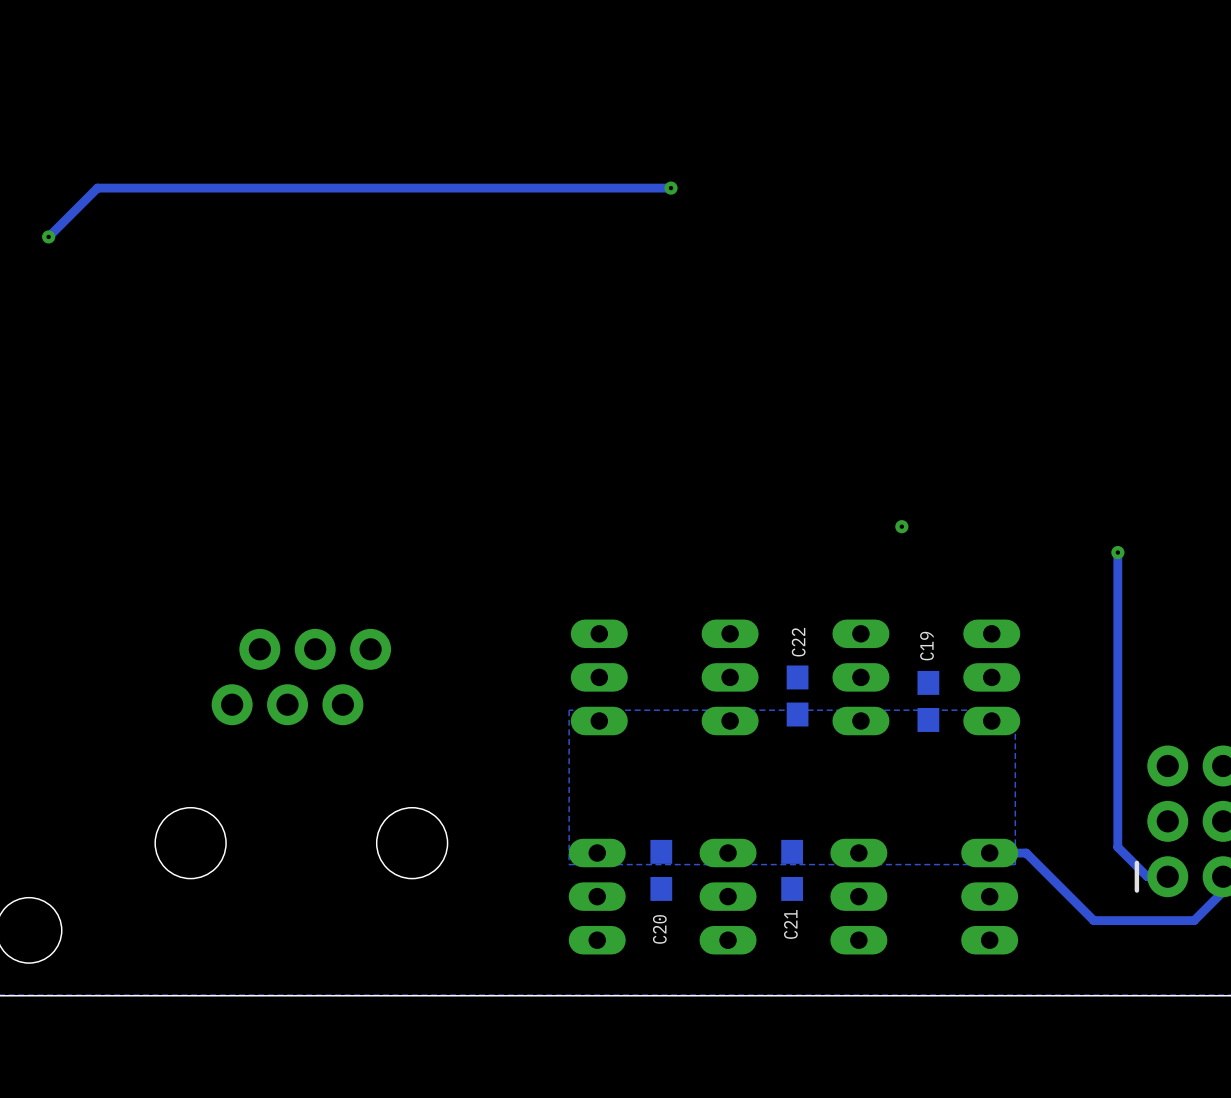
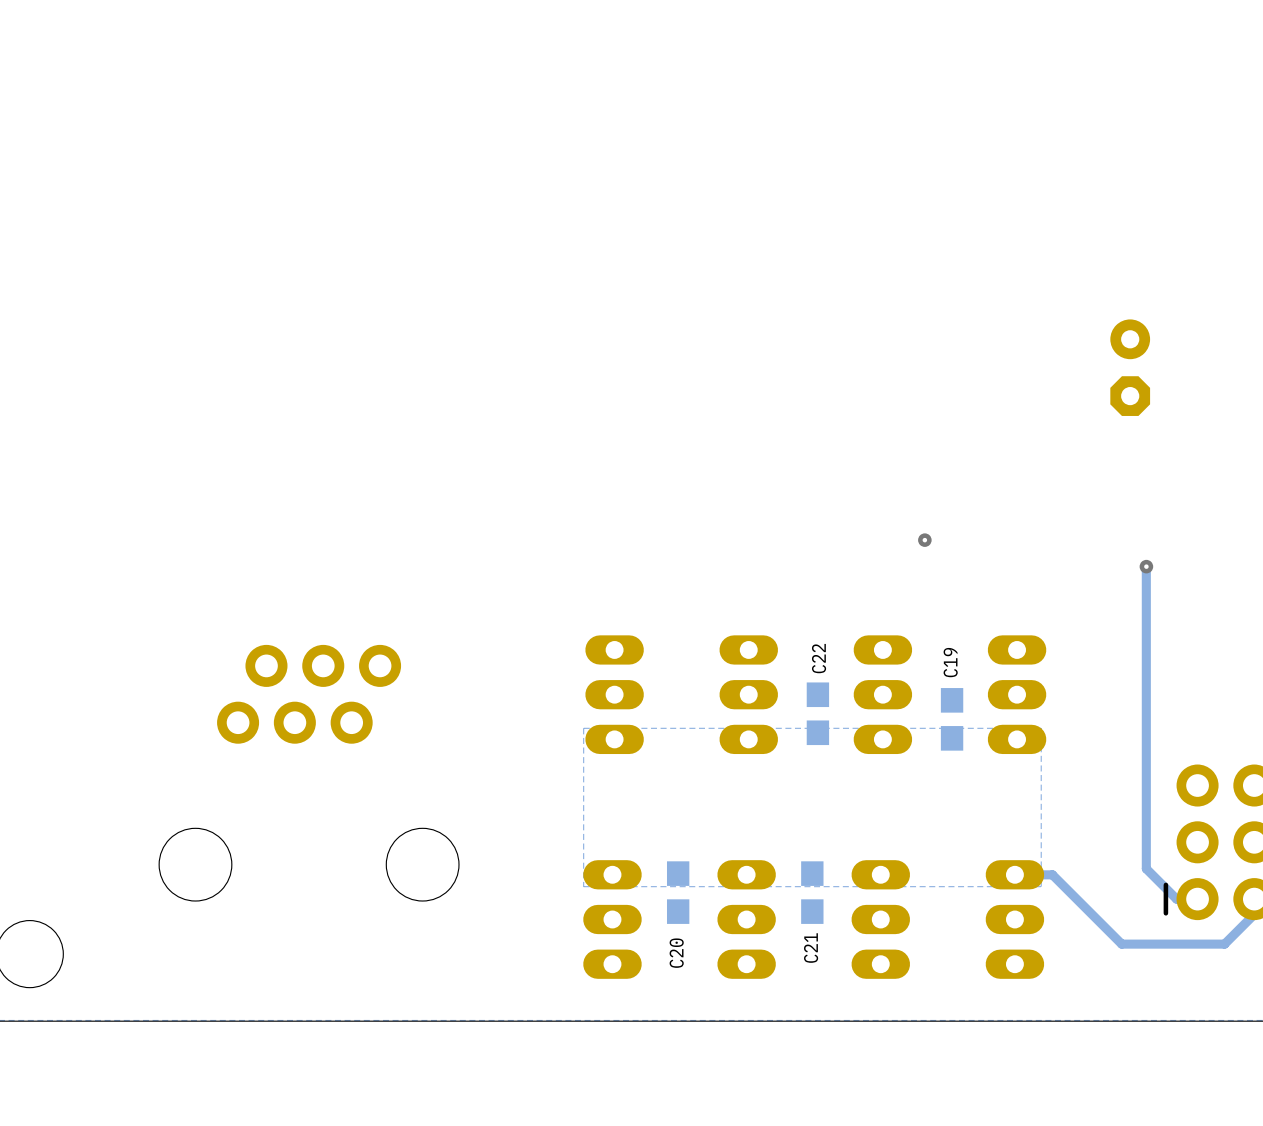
track: (671, 188) (97, 188) (48, 236) -> none
via: (671, 188) -> none
via: (48, 236) -> none
part: none -> (1130, 367)

